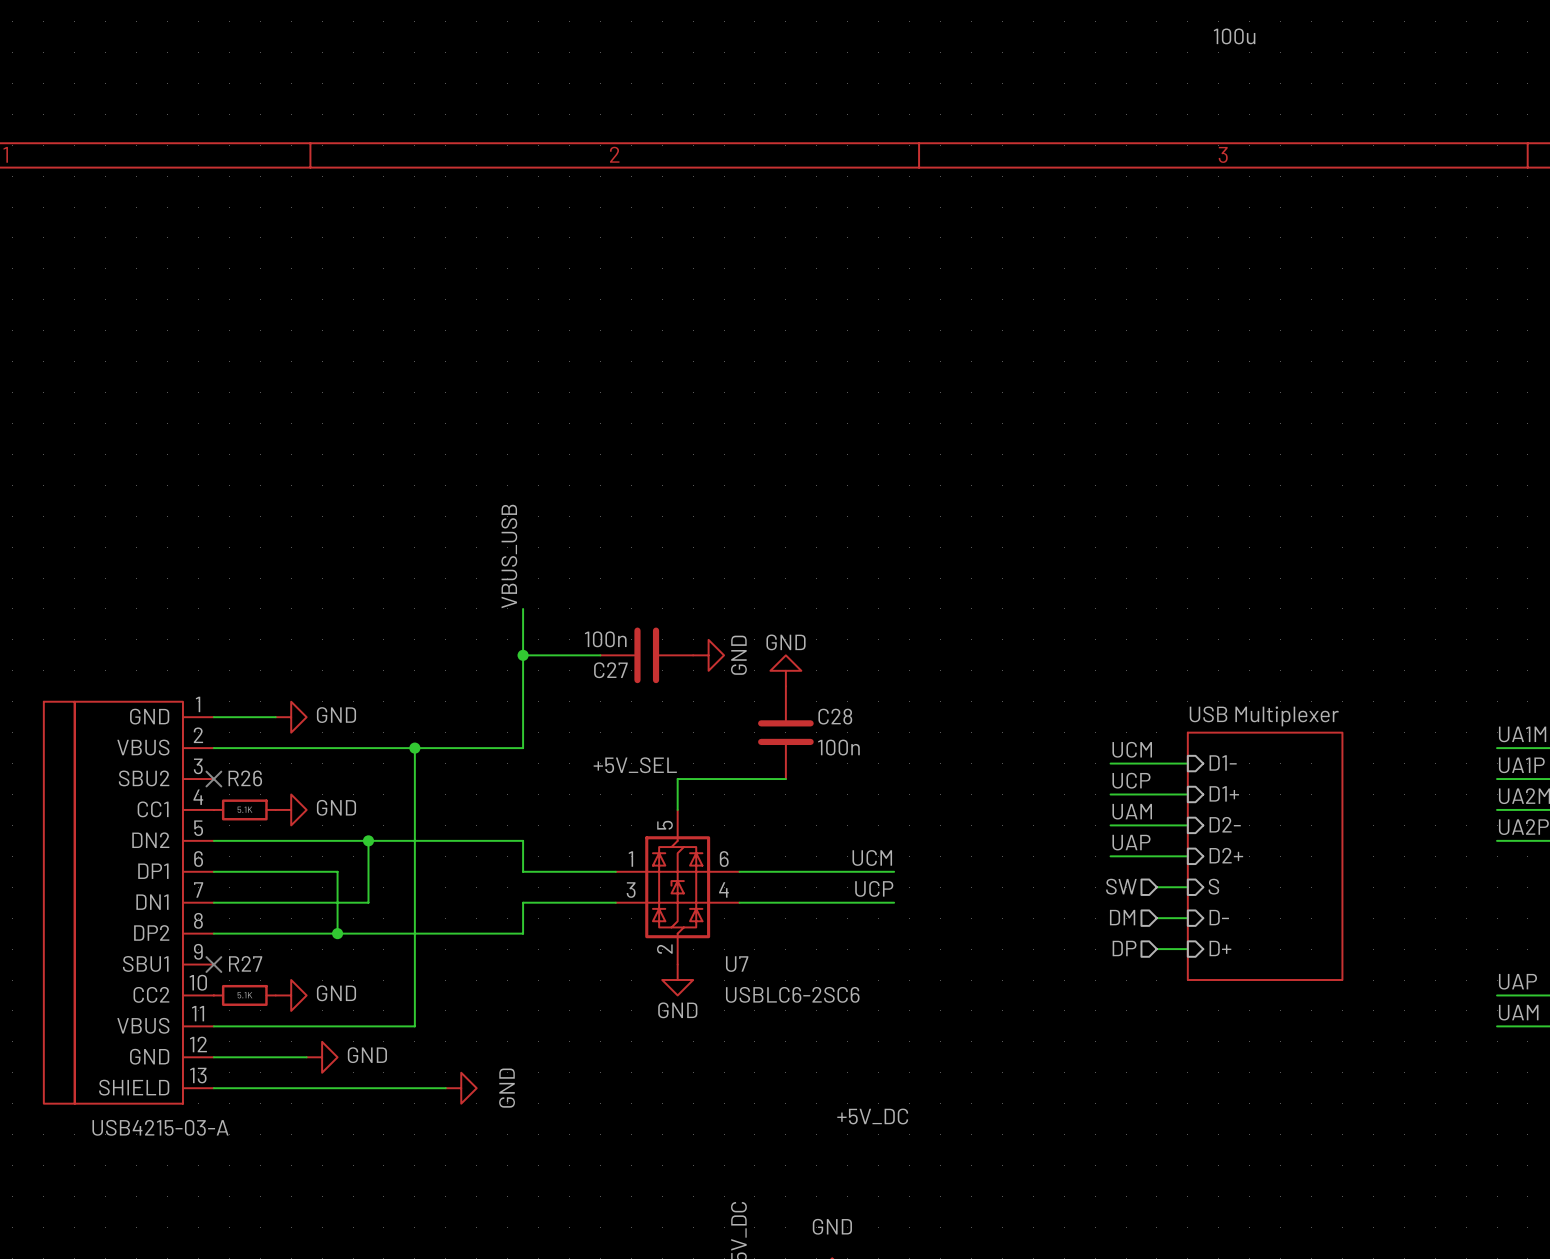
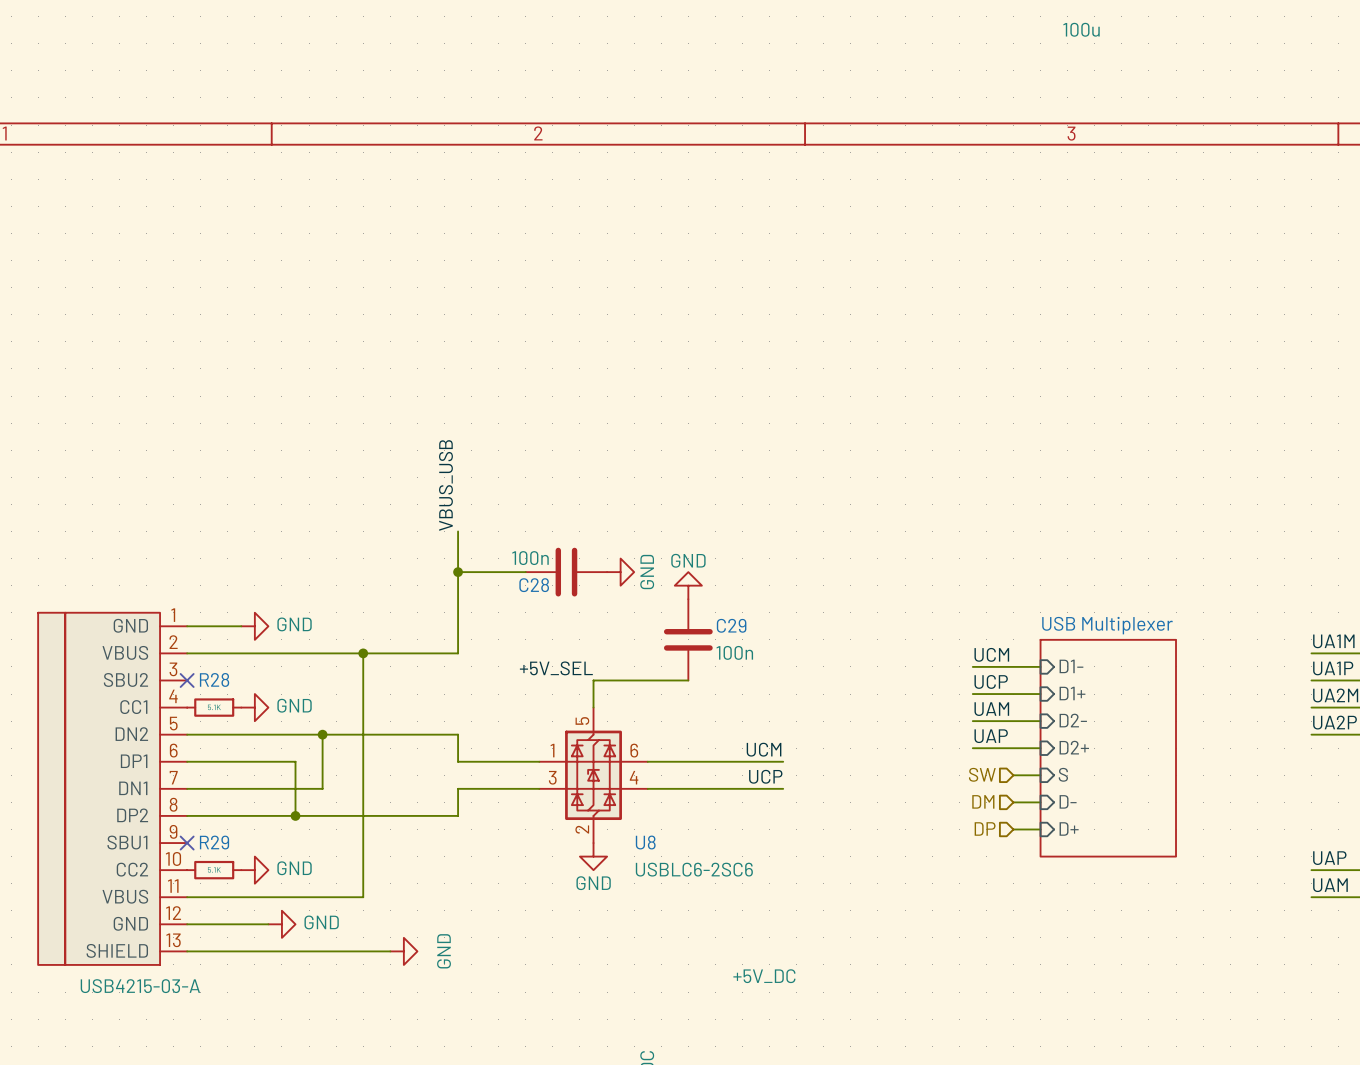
C27 name: C27 (610, 670) -> C28 (534, 585)
C28 name: C28 (835, 716) -> C29 (731, 625)
R26 name: R26 (245, 778) -> R28 (214, 679)
R27 name: R27 (245, 963) -> R29 (214, 842)
U7 name: U7 (737, 964) -> U8 (645, 842)

